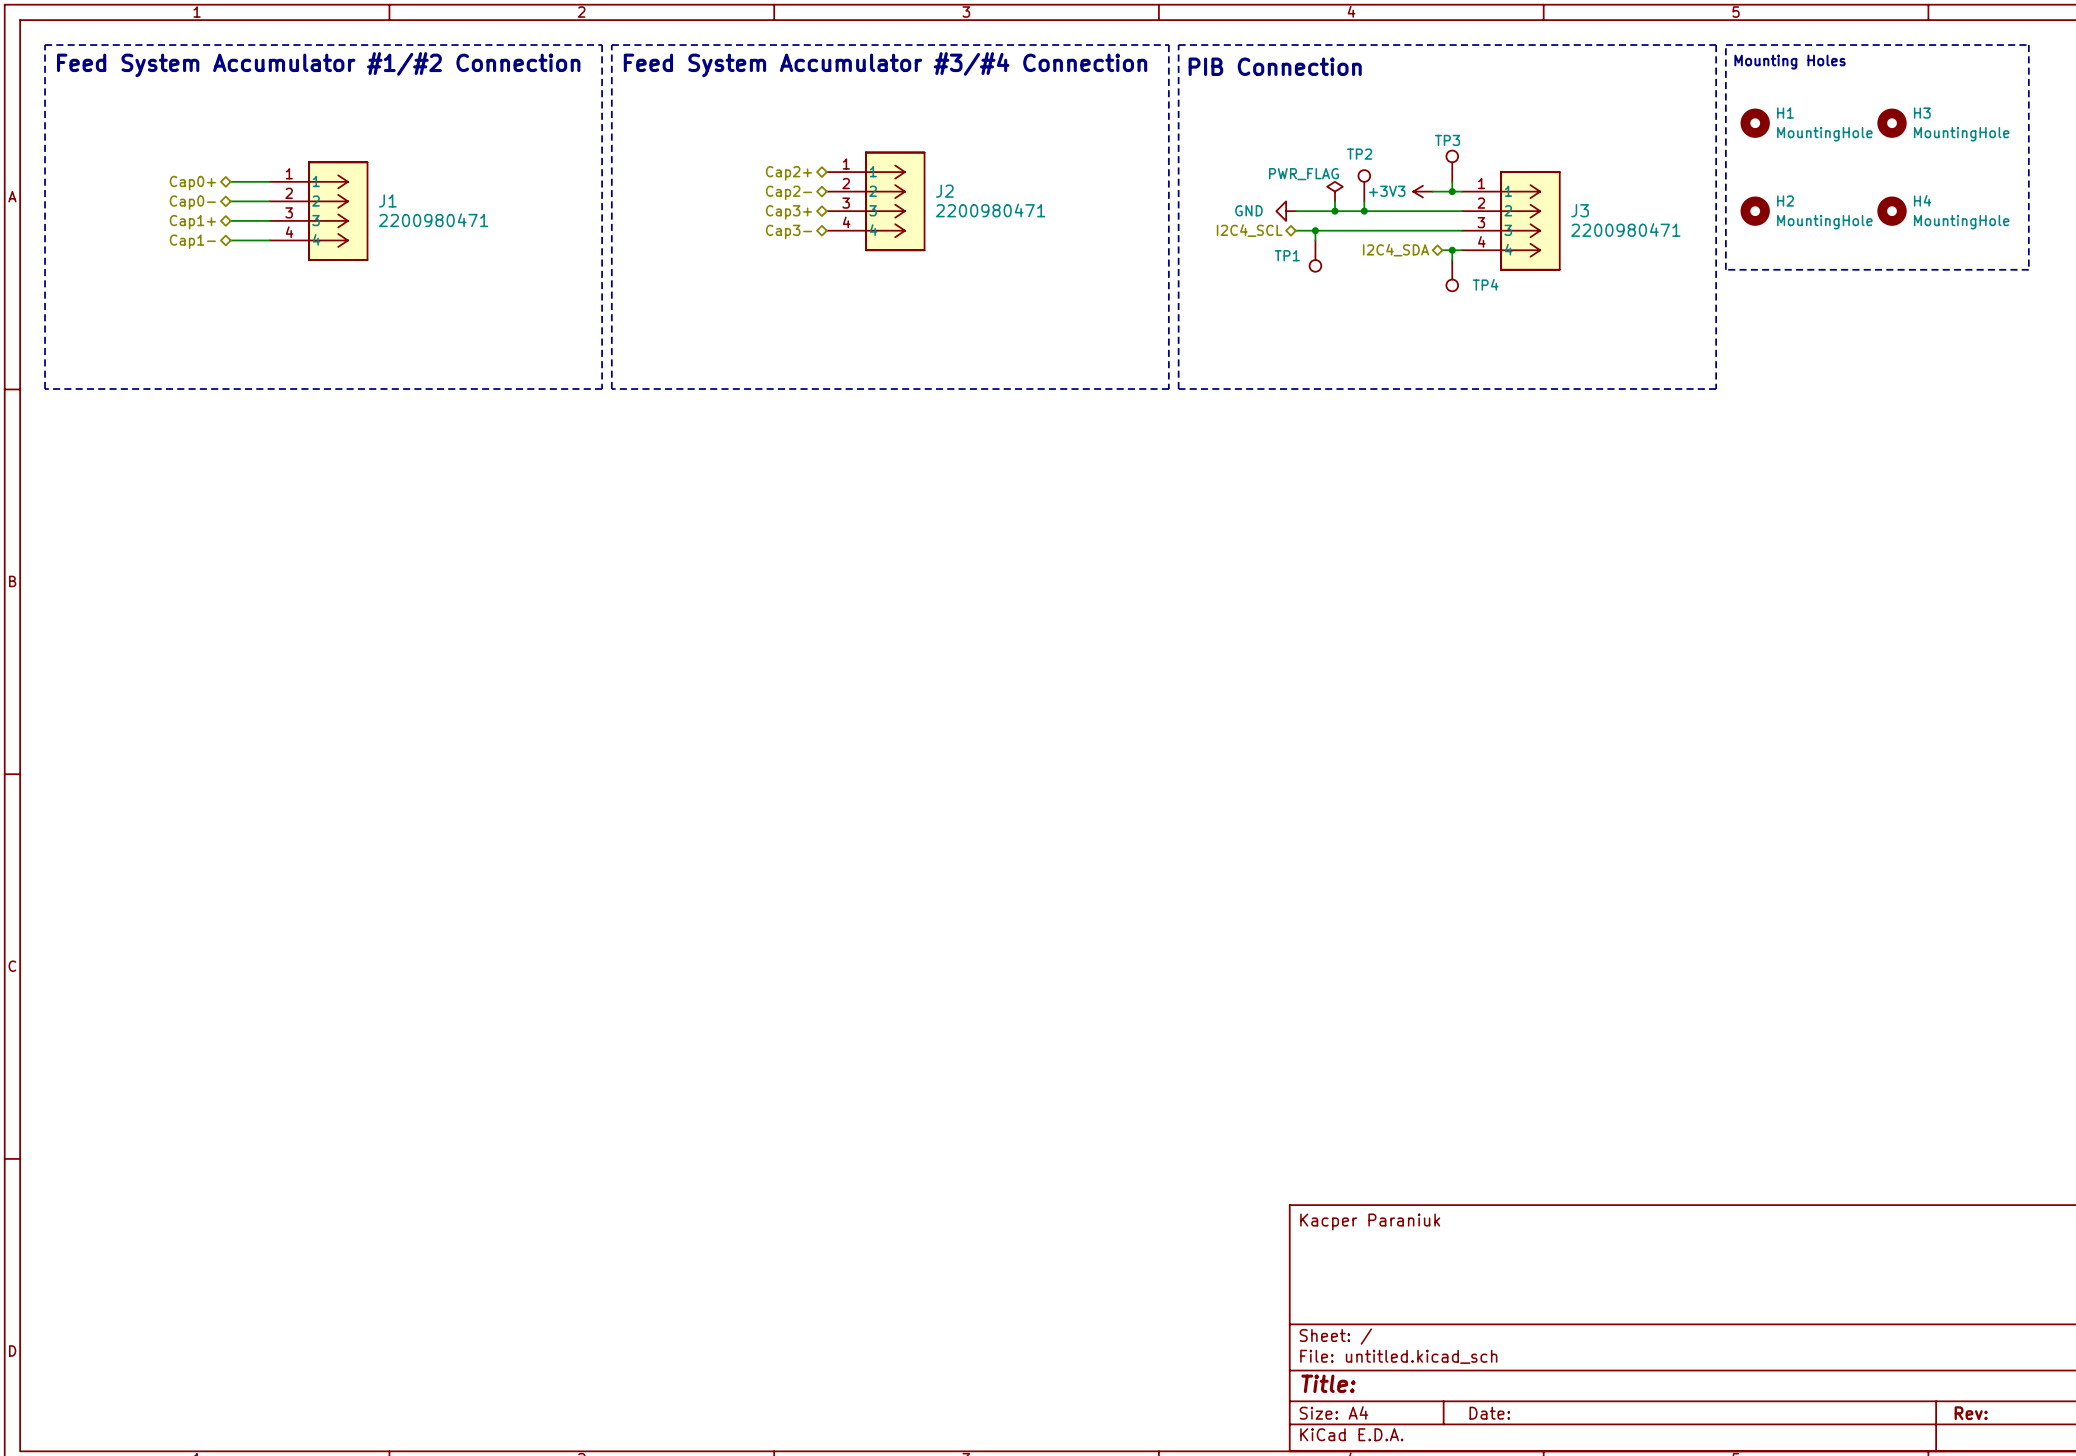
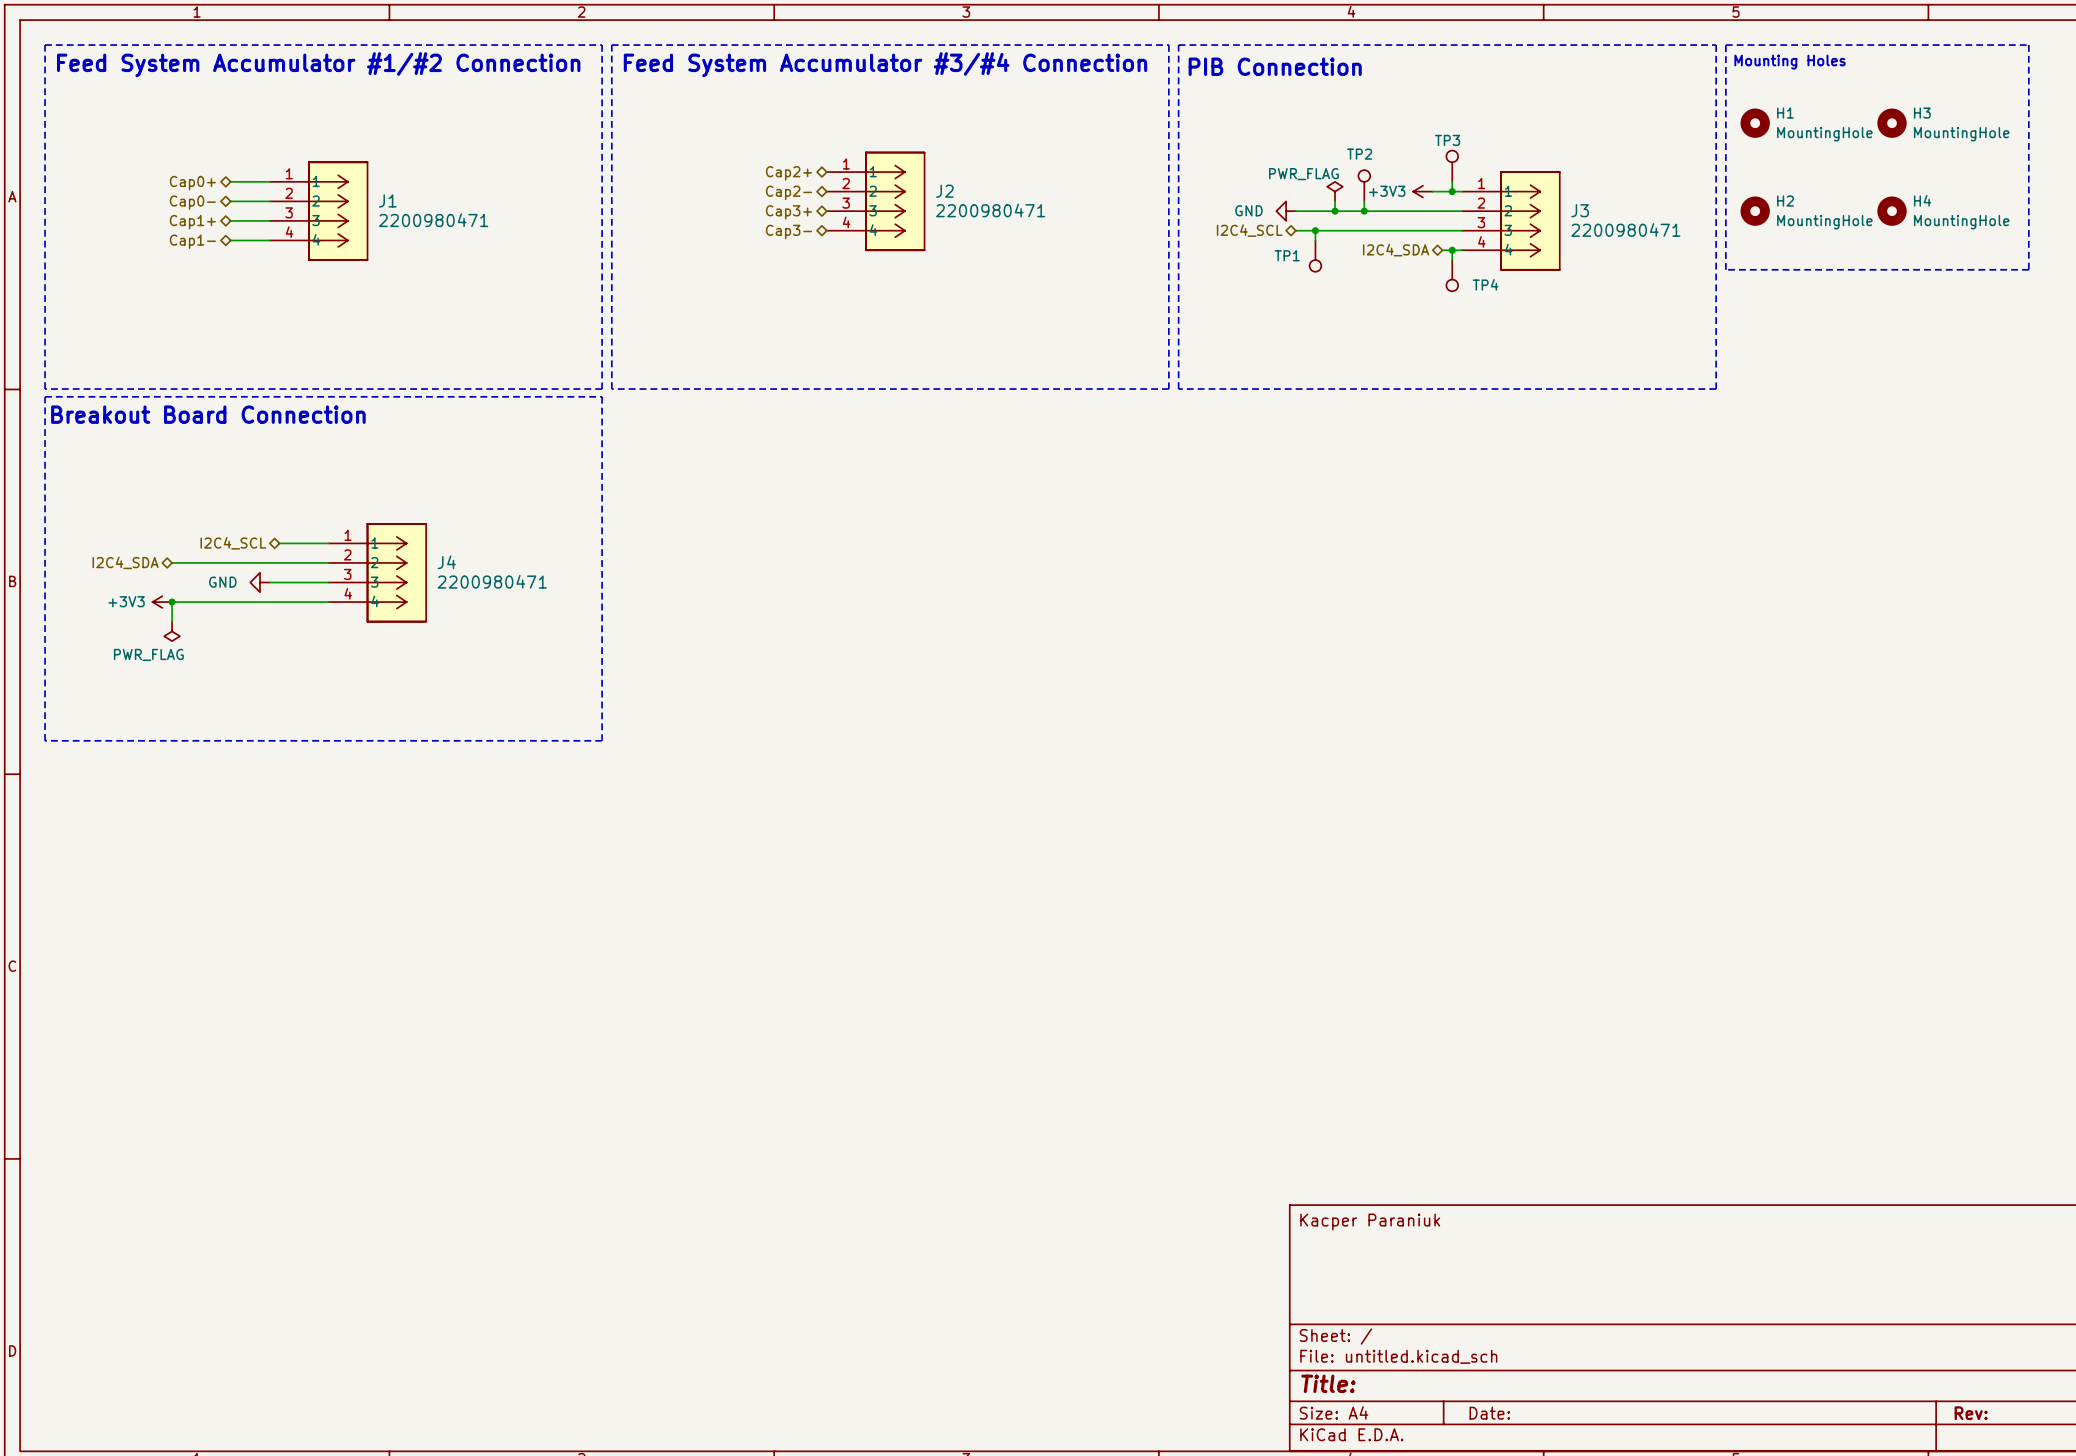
line: none -> (45, 396) (602, 396) (602, 740) (45, 740) (45, 396)
text: none -> Breakout Board Connection (208, 414)
hierarchical label: none -> I2C4_SCL (233, 543)
wire: none -> (279, 543) (328, 543)
hierarchical label: none -> I2C4_SDA (125, 562)
wire: none -> (172, 562) (328, 562)
J4: none -> 2200980471 (377, 572)
power symbol: none -> GND (260, 582)
wire: none -> (269, 582) (328, 582)
power symbol: none -> +3V3 (162, 602)
junction: none -> (172, 602)
wire: none -> (328, 602) (172, 602) (172, 621)
power symbol: none -> PWR_FLAG (172, 631)

